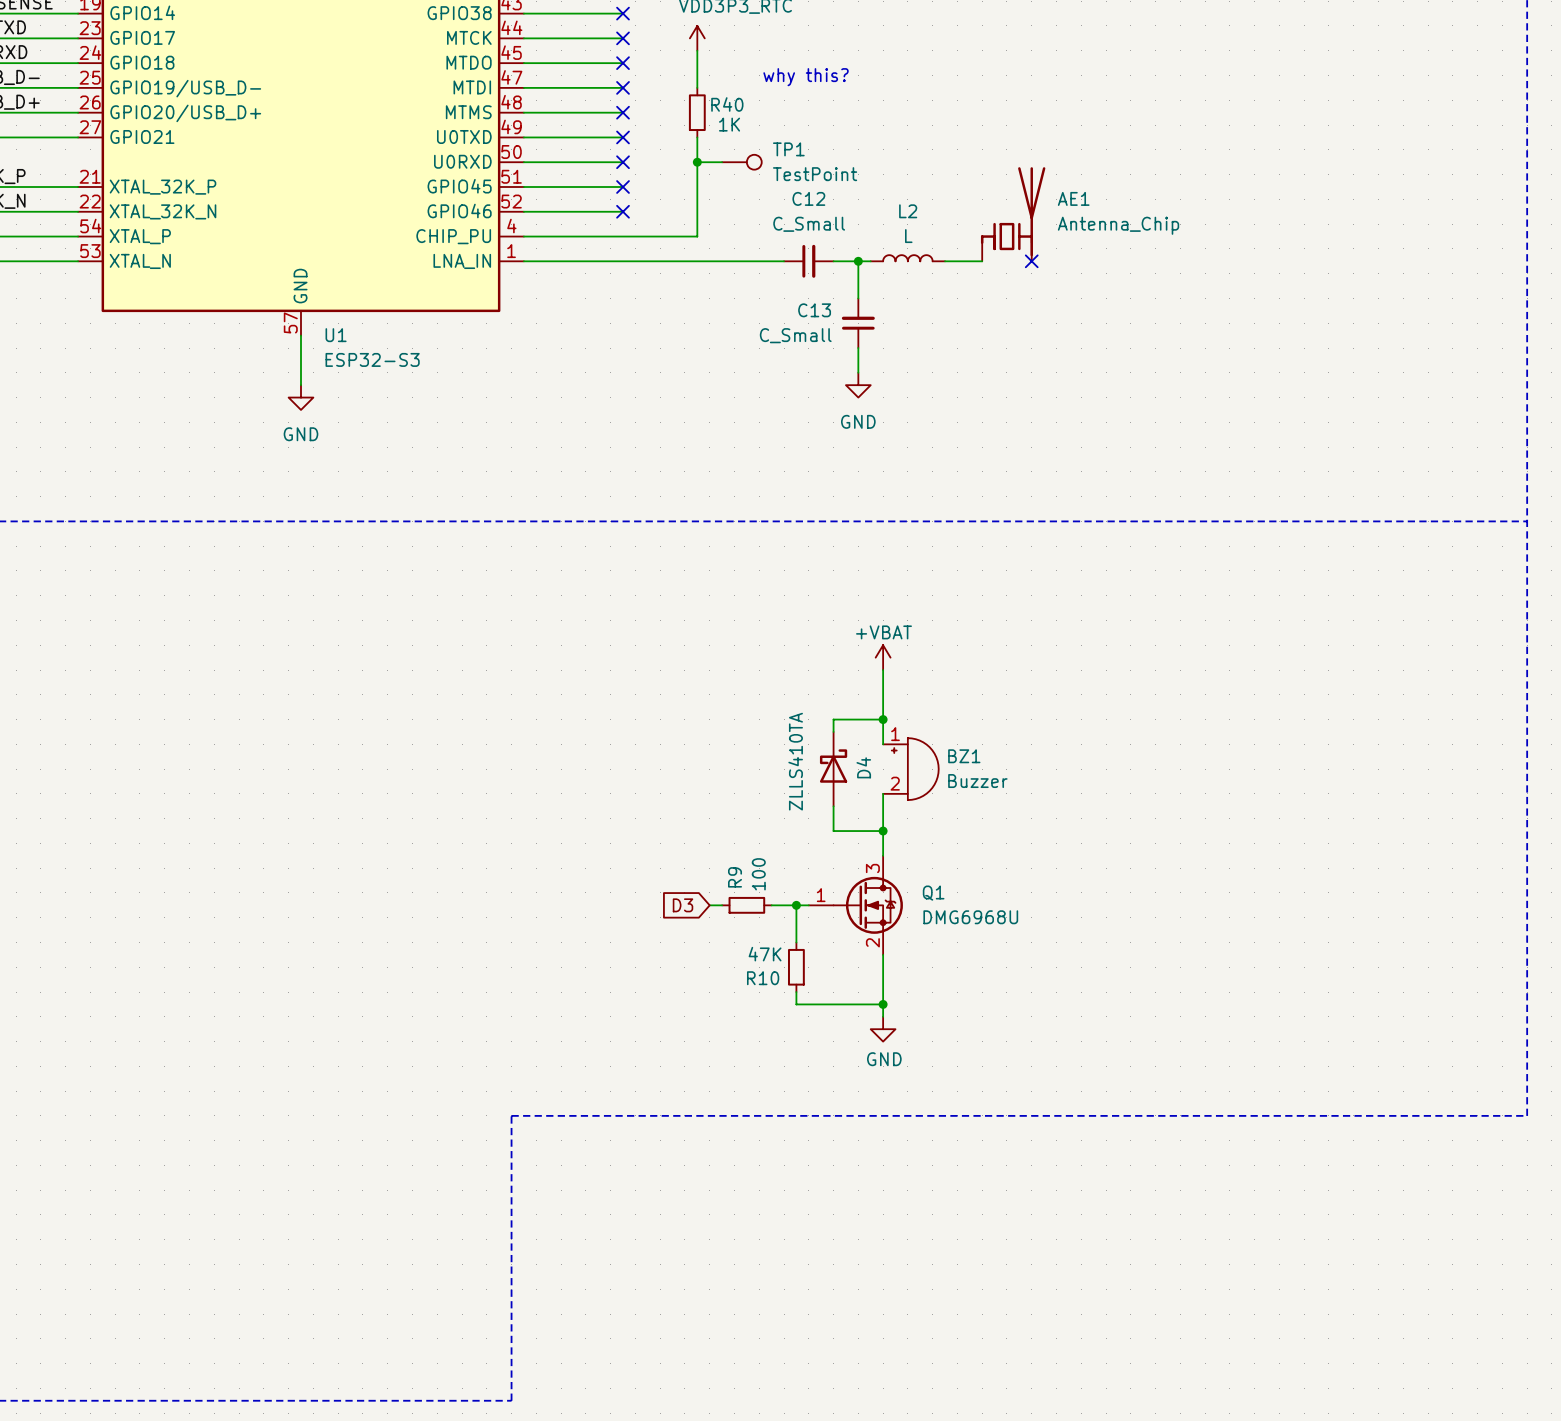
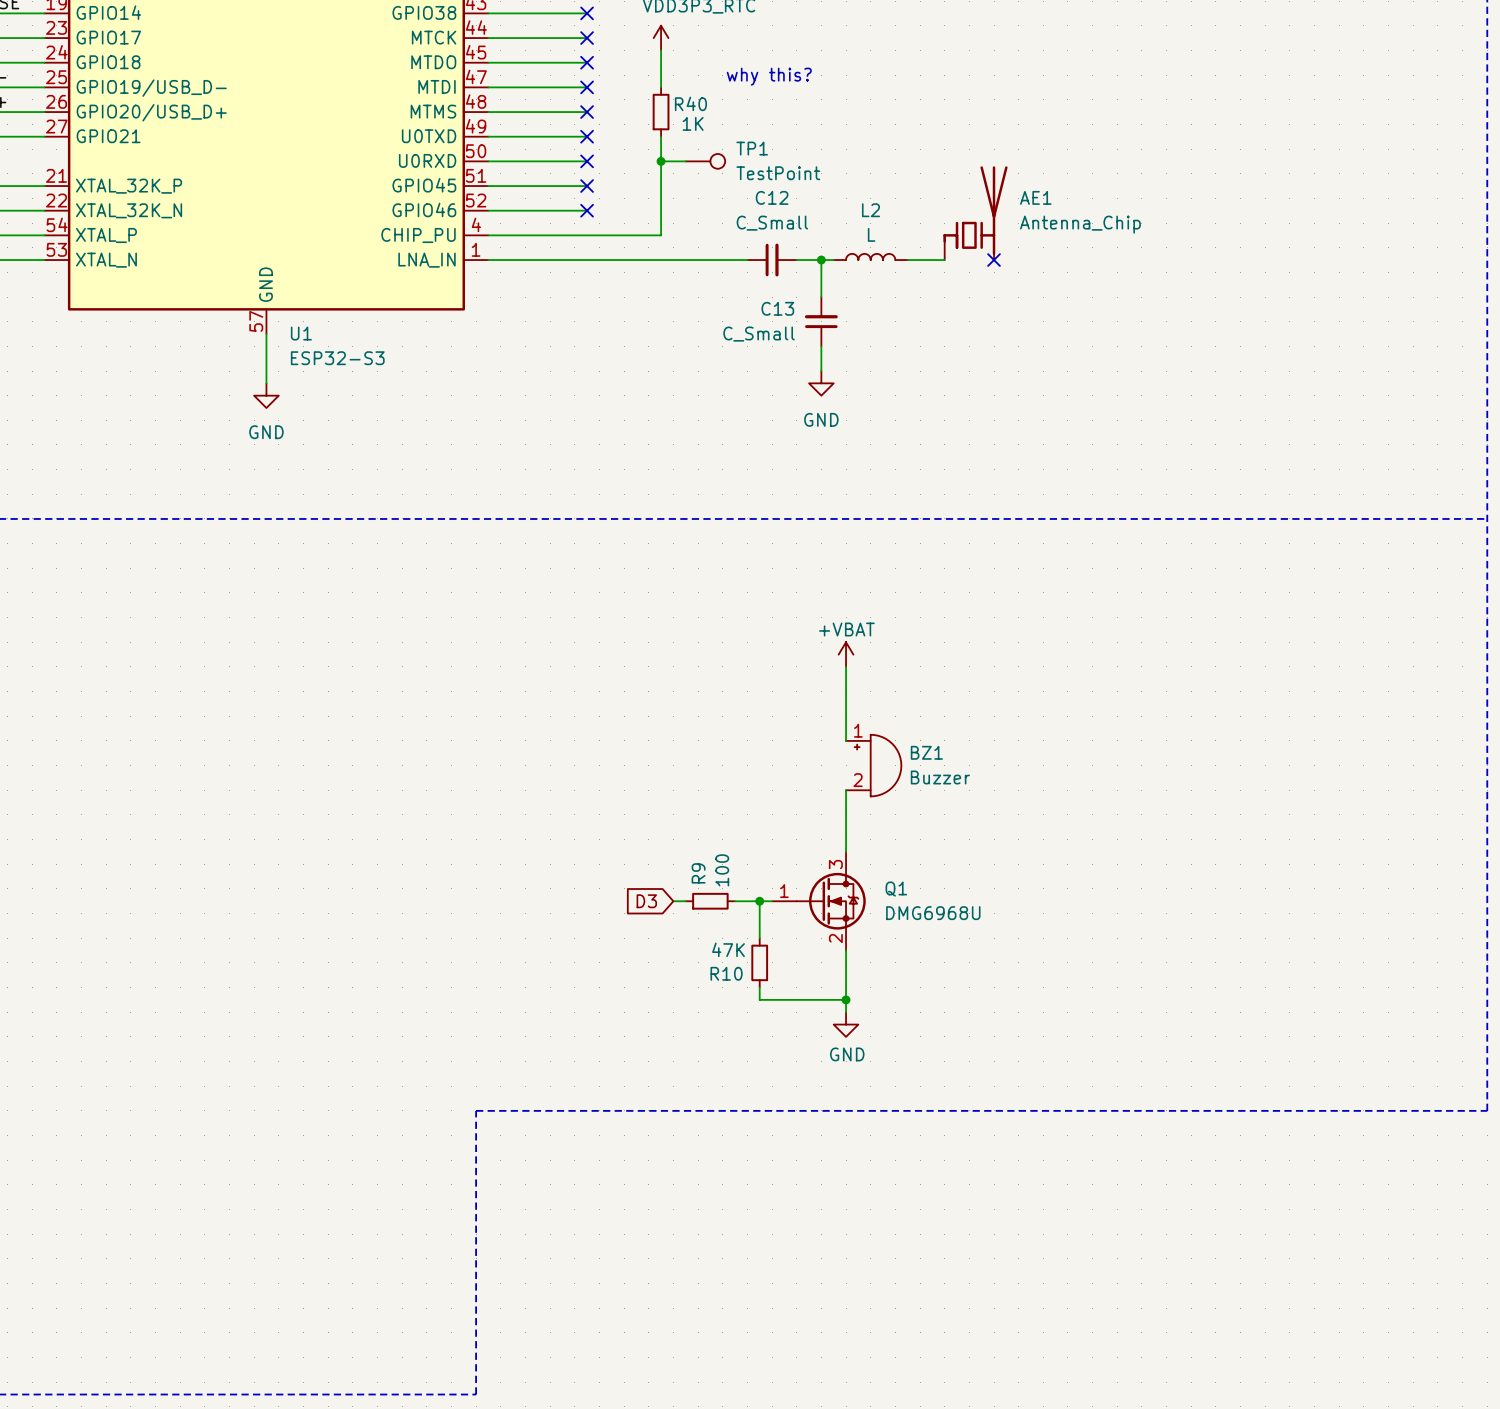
wire: (883, 719) (833, 719) (833, 731) -> none
junction: (883, 719) -> none
D4: ZLLS410TA (833, 769) -> none
wire: (833, 806) (833, 831) (883, 831) -> none
junction: (883, 831) -> none

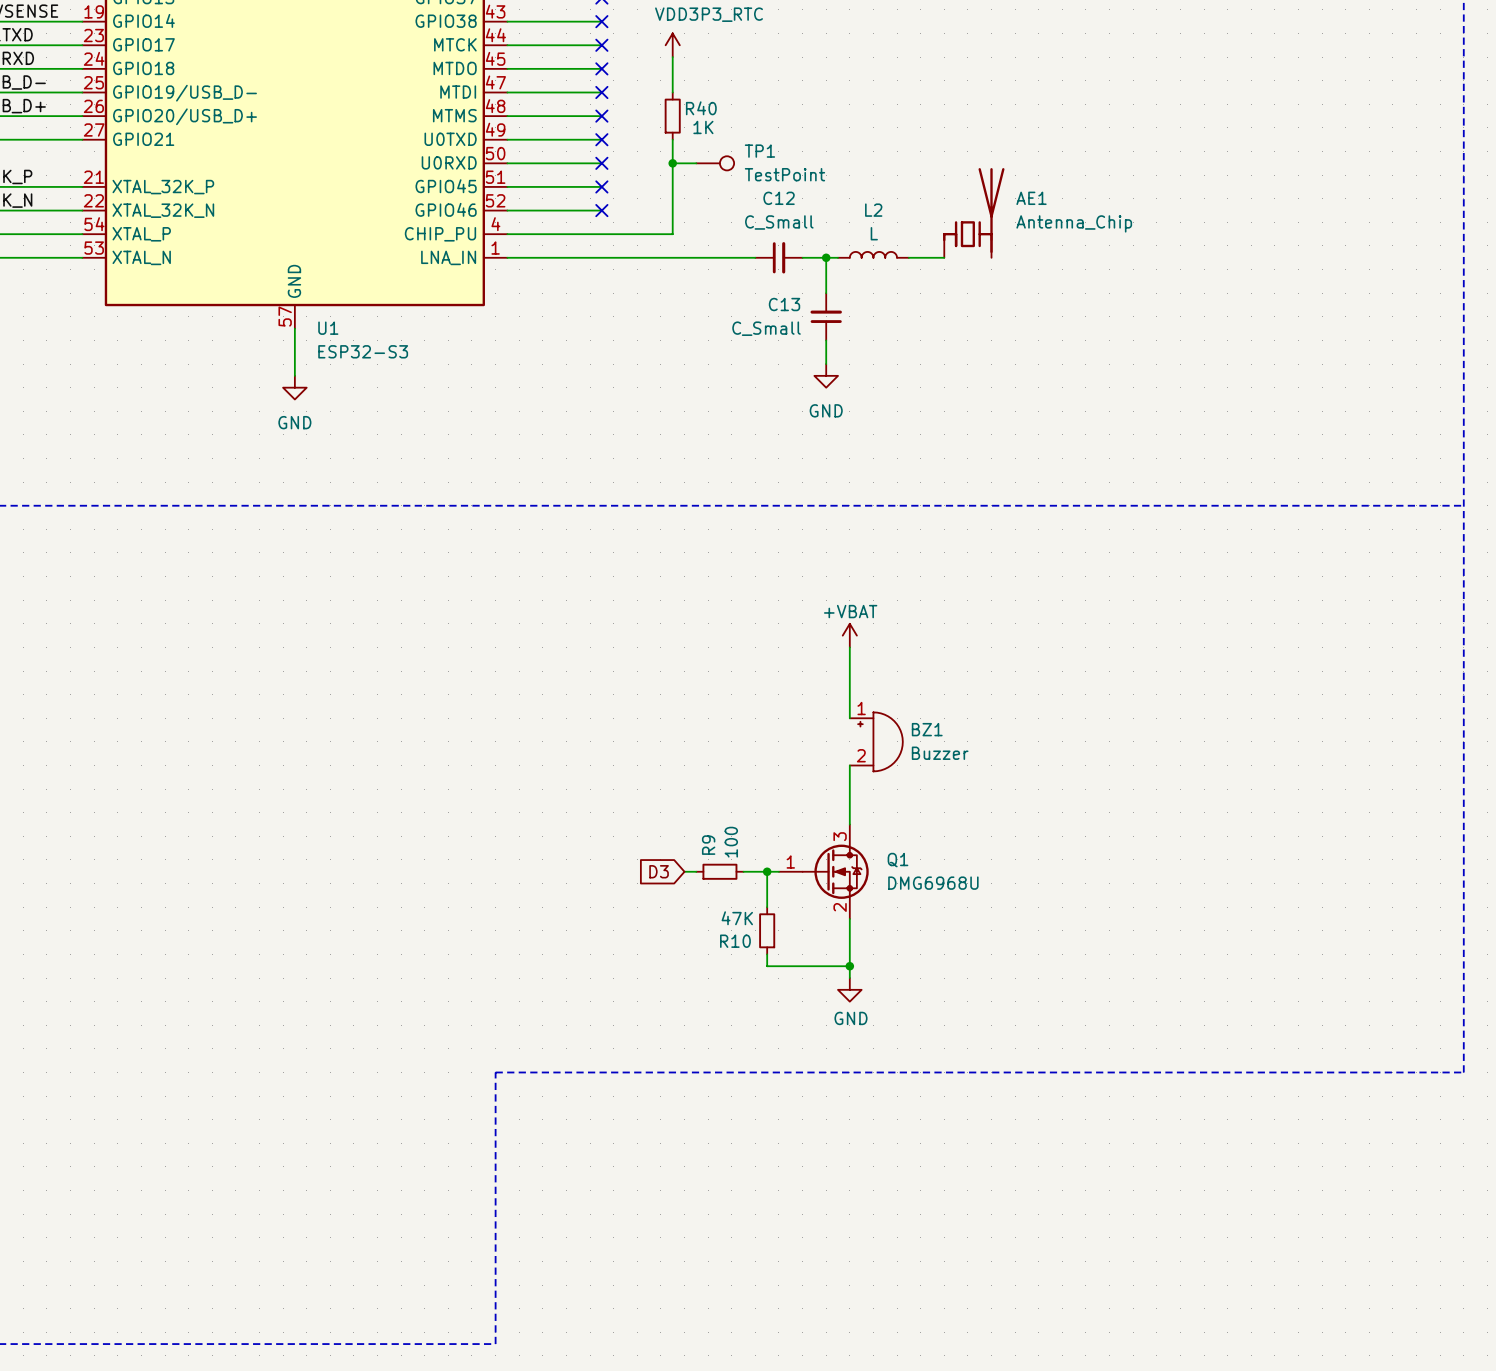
text: why this? (769, 76) -> none
no-connect mark: (994, 260) -> none

